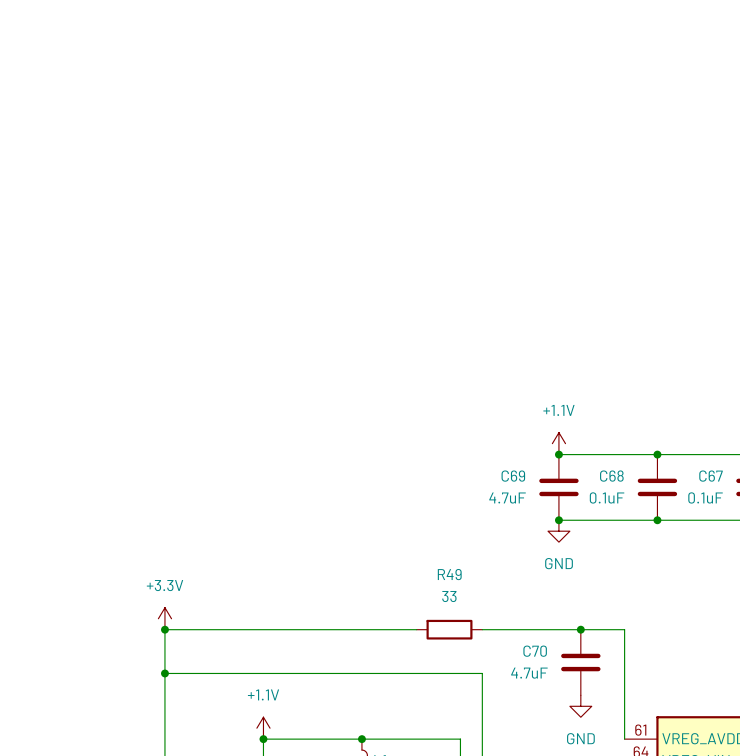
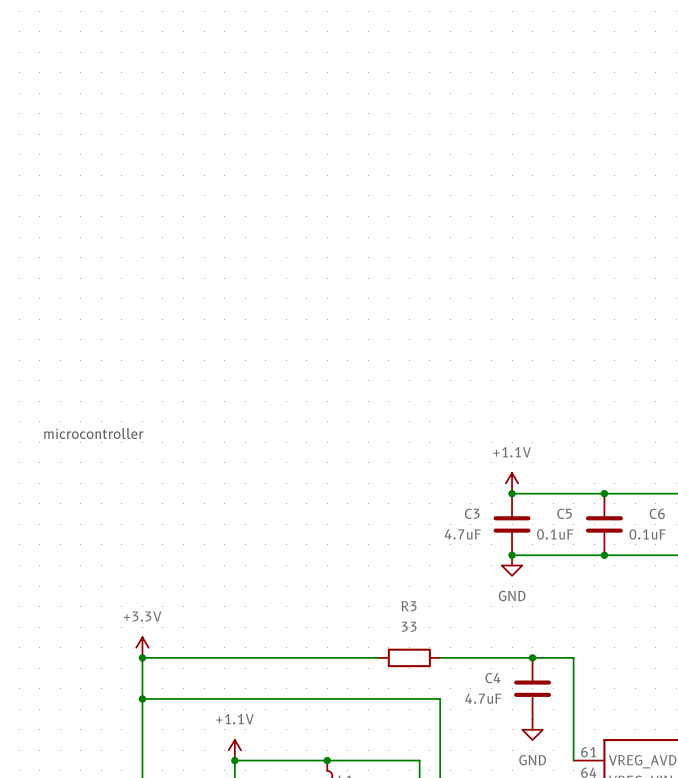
text: none -> microcontroller (93, 433)
C69 name: C69 (513, 476) -> C3 (472, 513)
C68 name: C68 (611, 476) -> C5 (564, 513)
C67 name: C67 (711, 476) -> C6 (657, 513)
R49 name: R49 (449, 574) -> R3 (409, 606)
C70 name: C70 (535, 651) -> C4 (492, 678)

